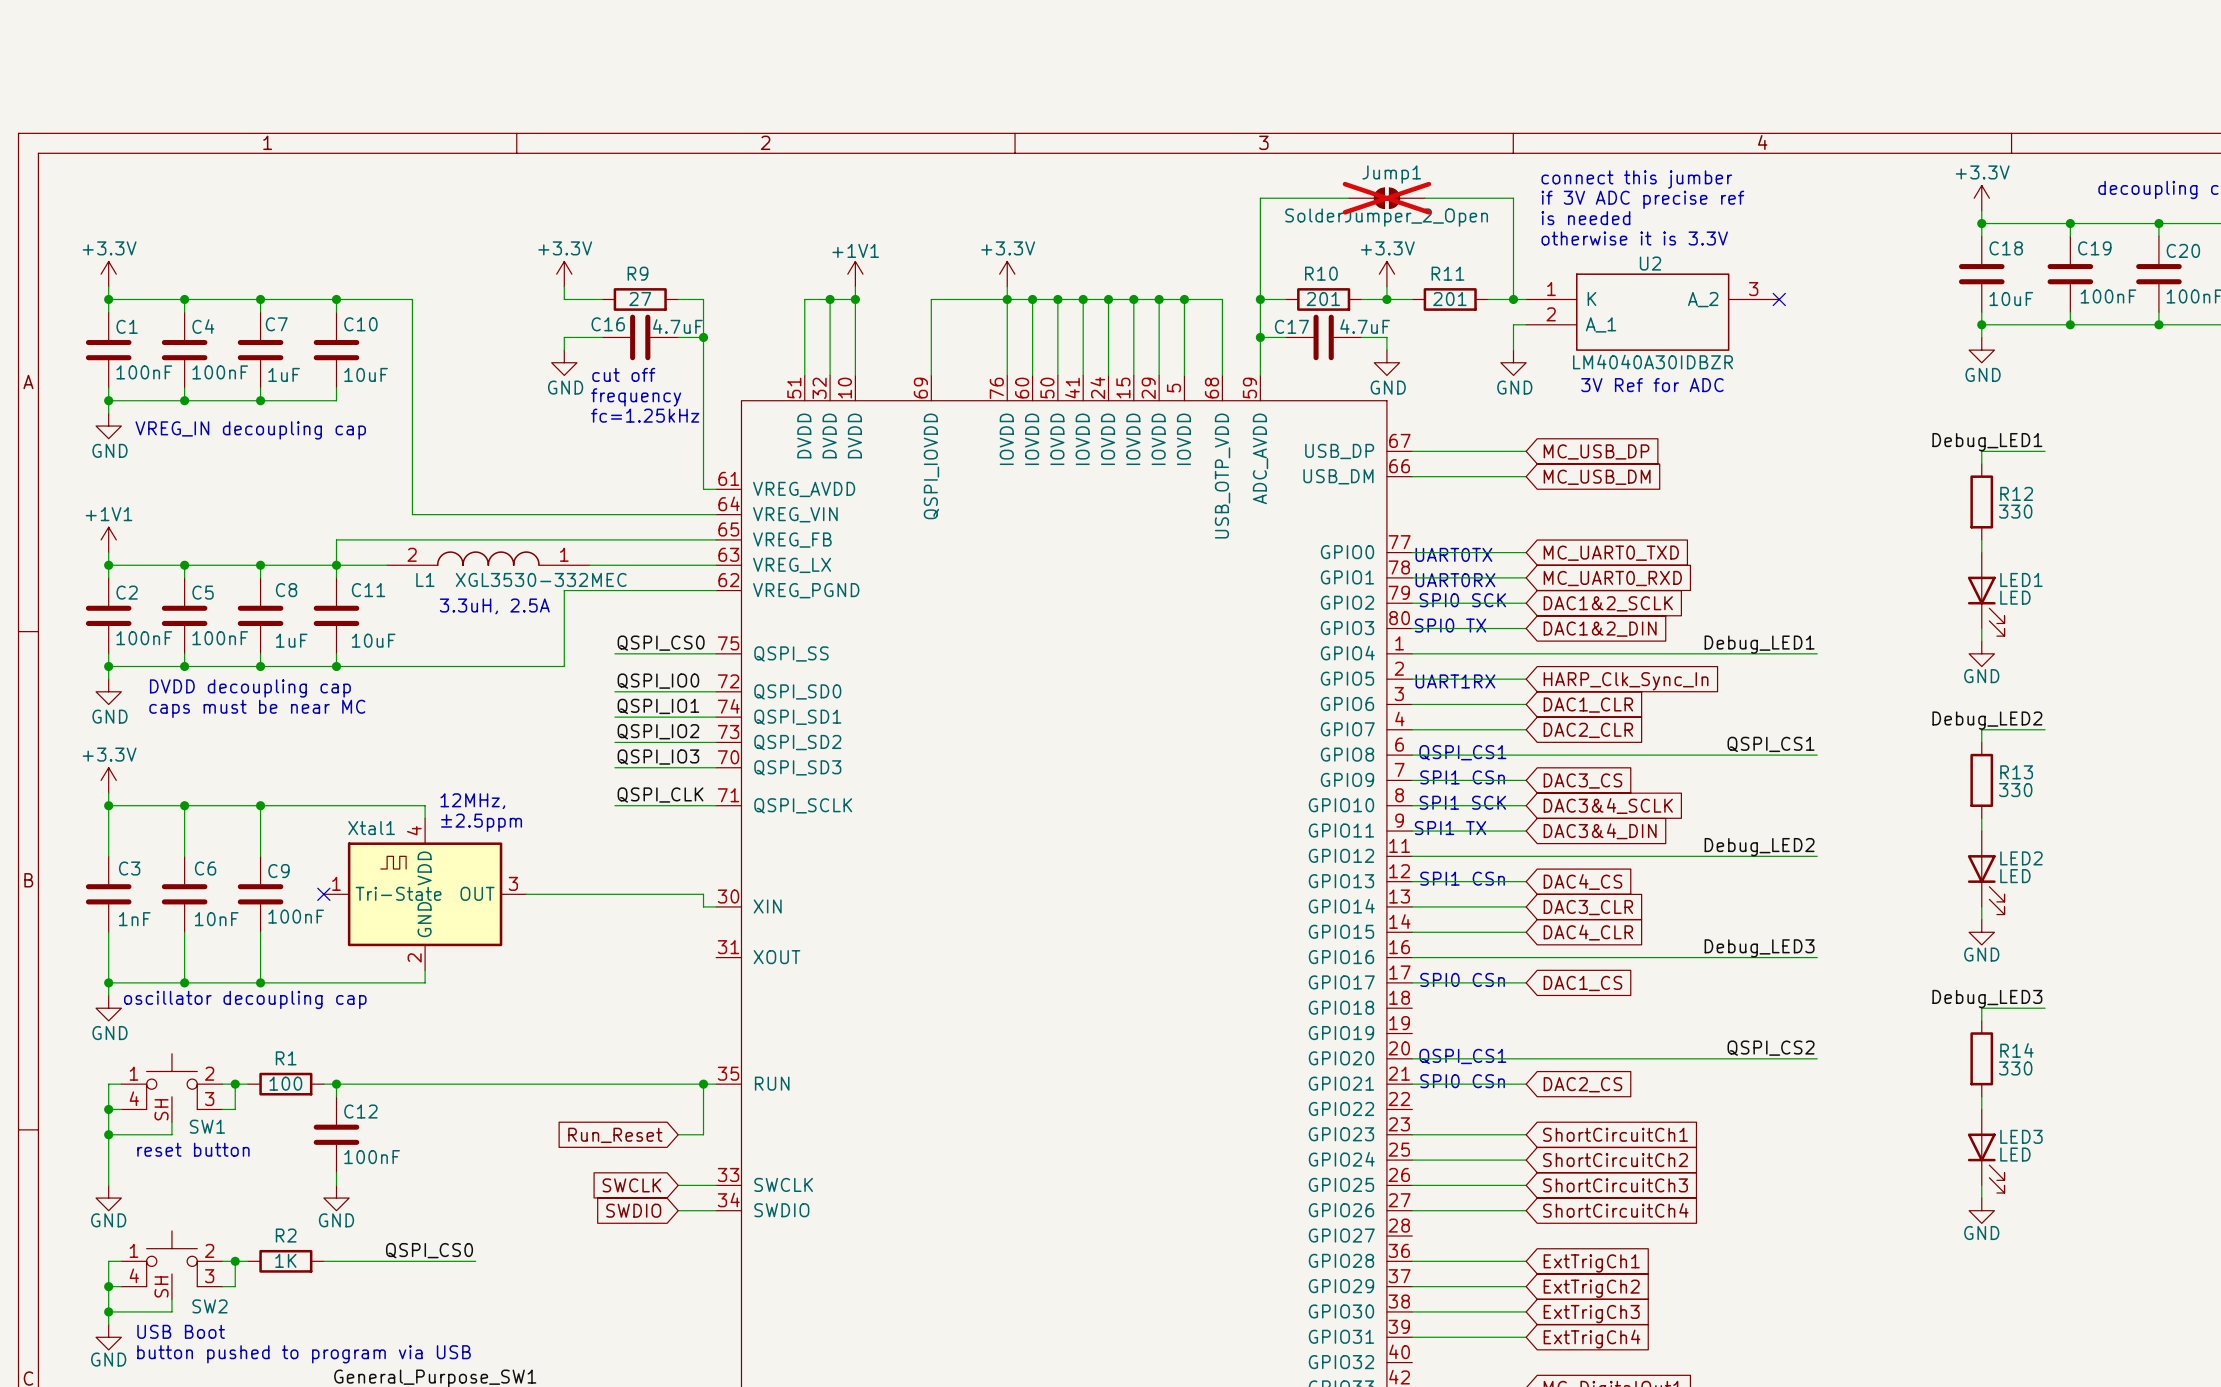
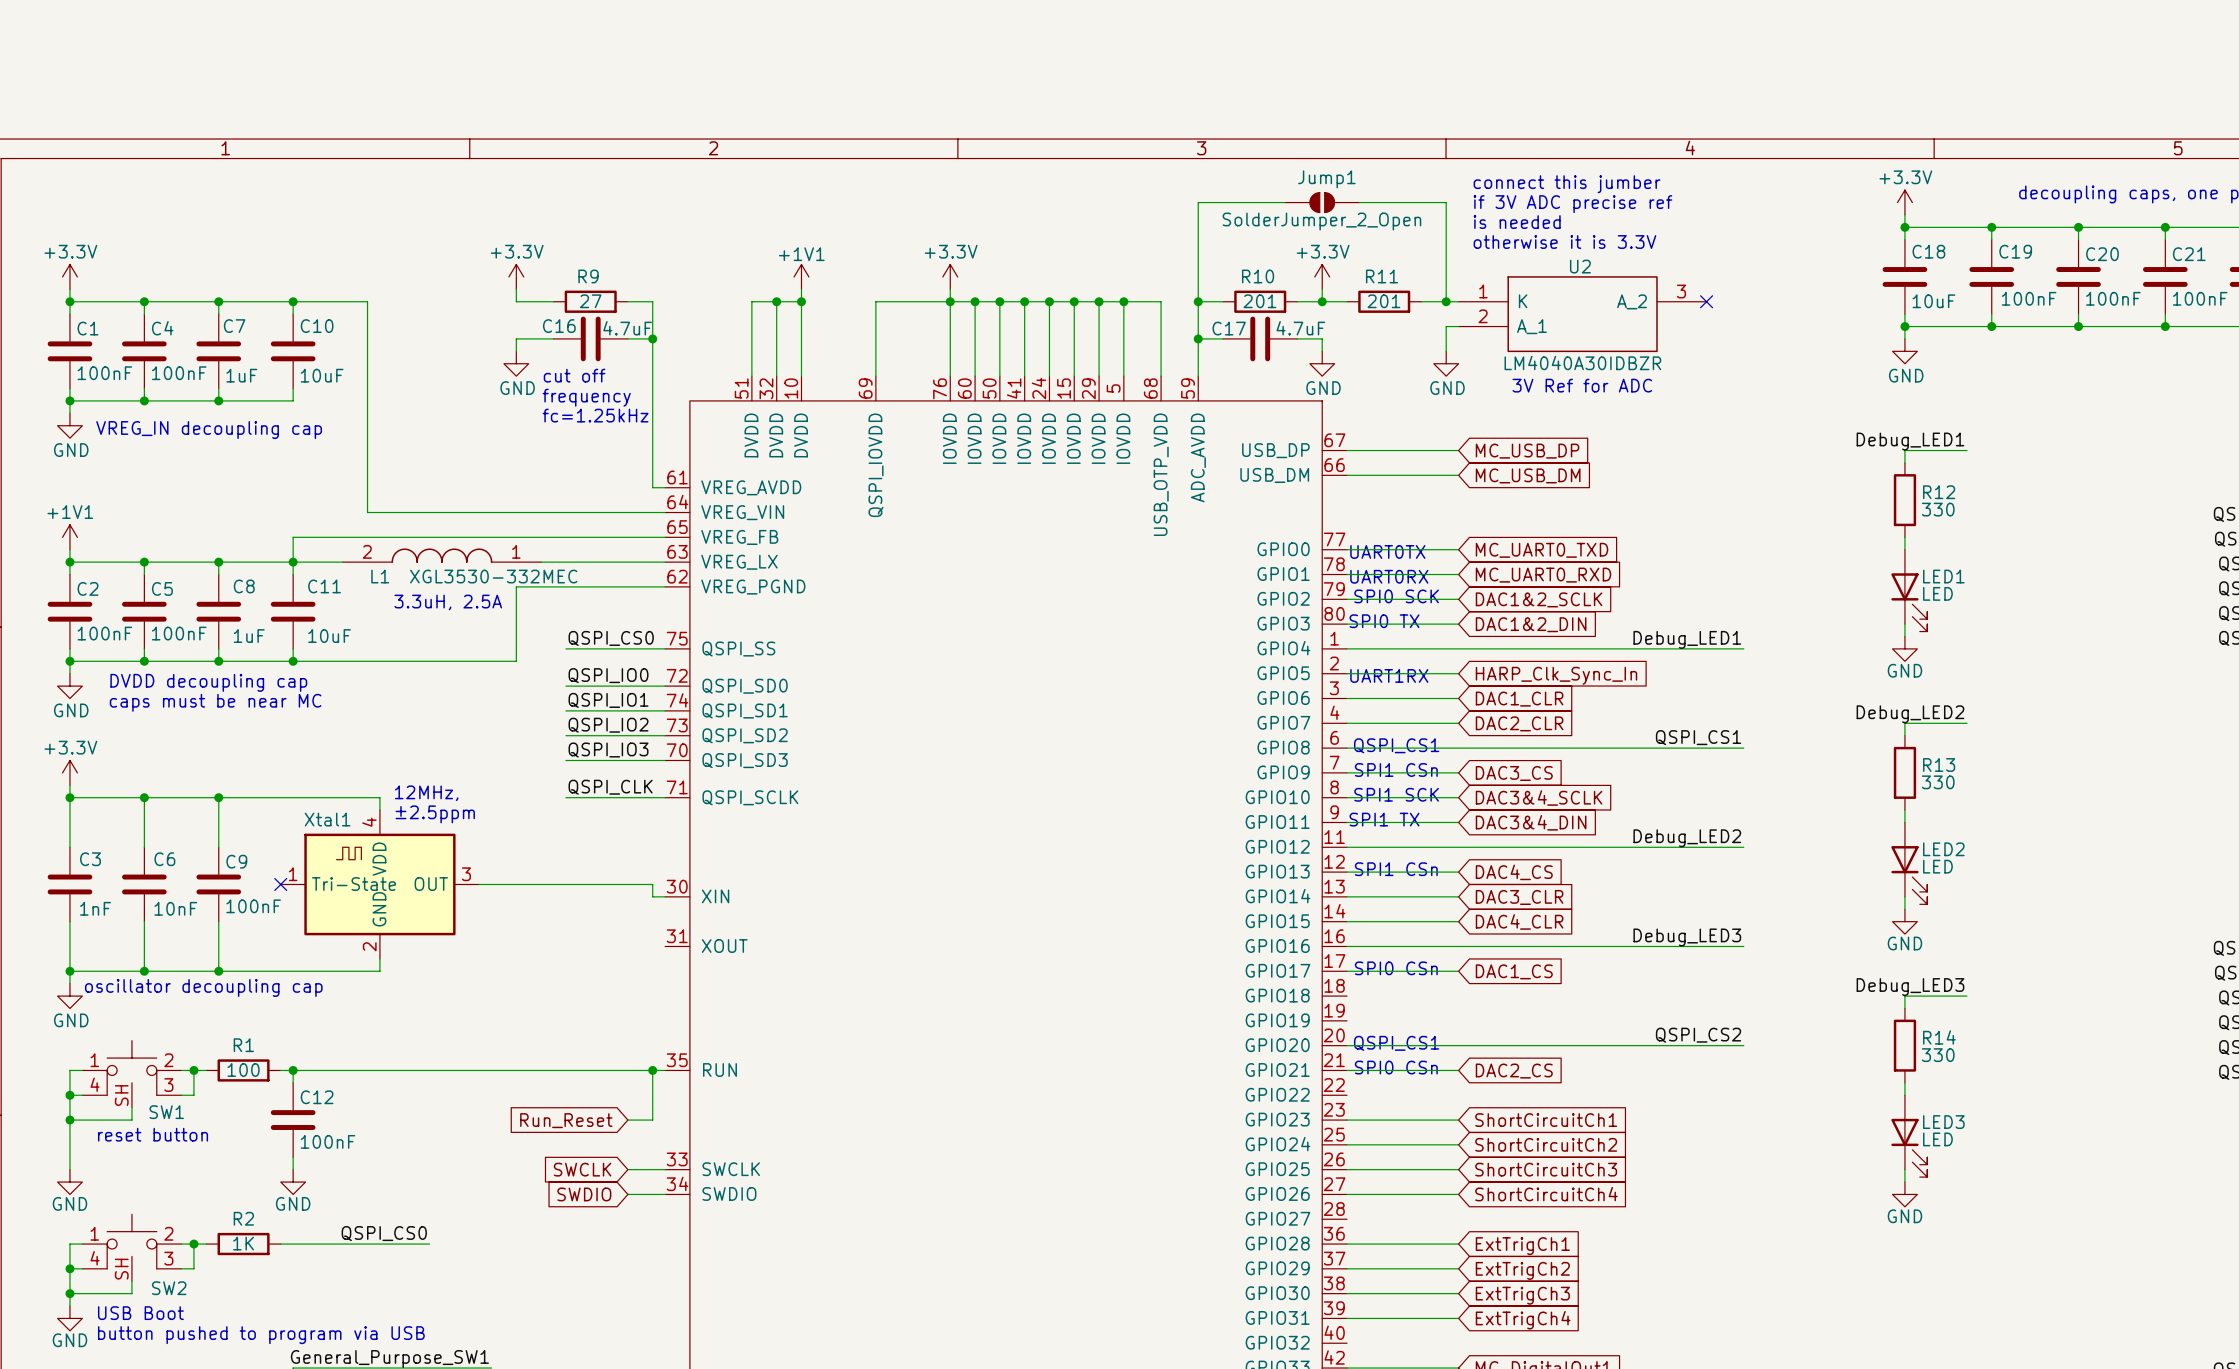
Jump1 do-not-place cross: (1386, 198) -> none

